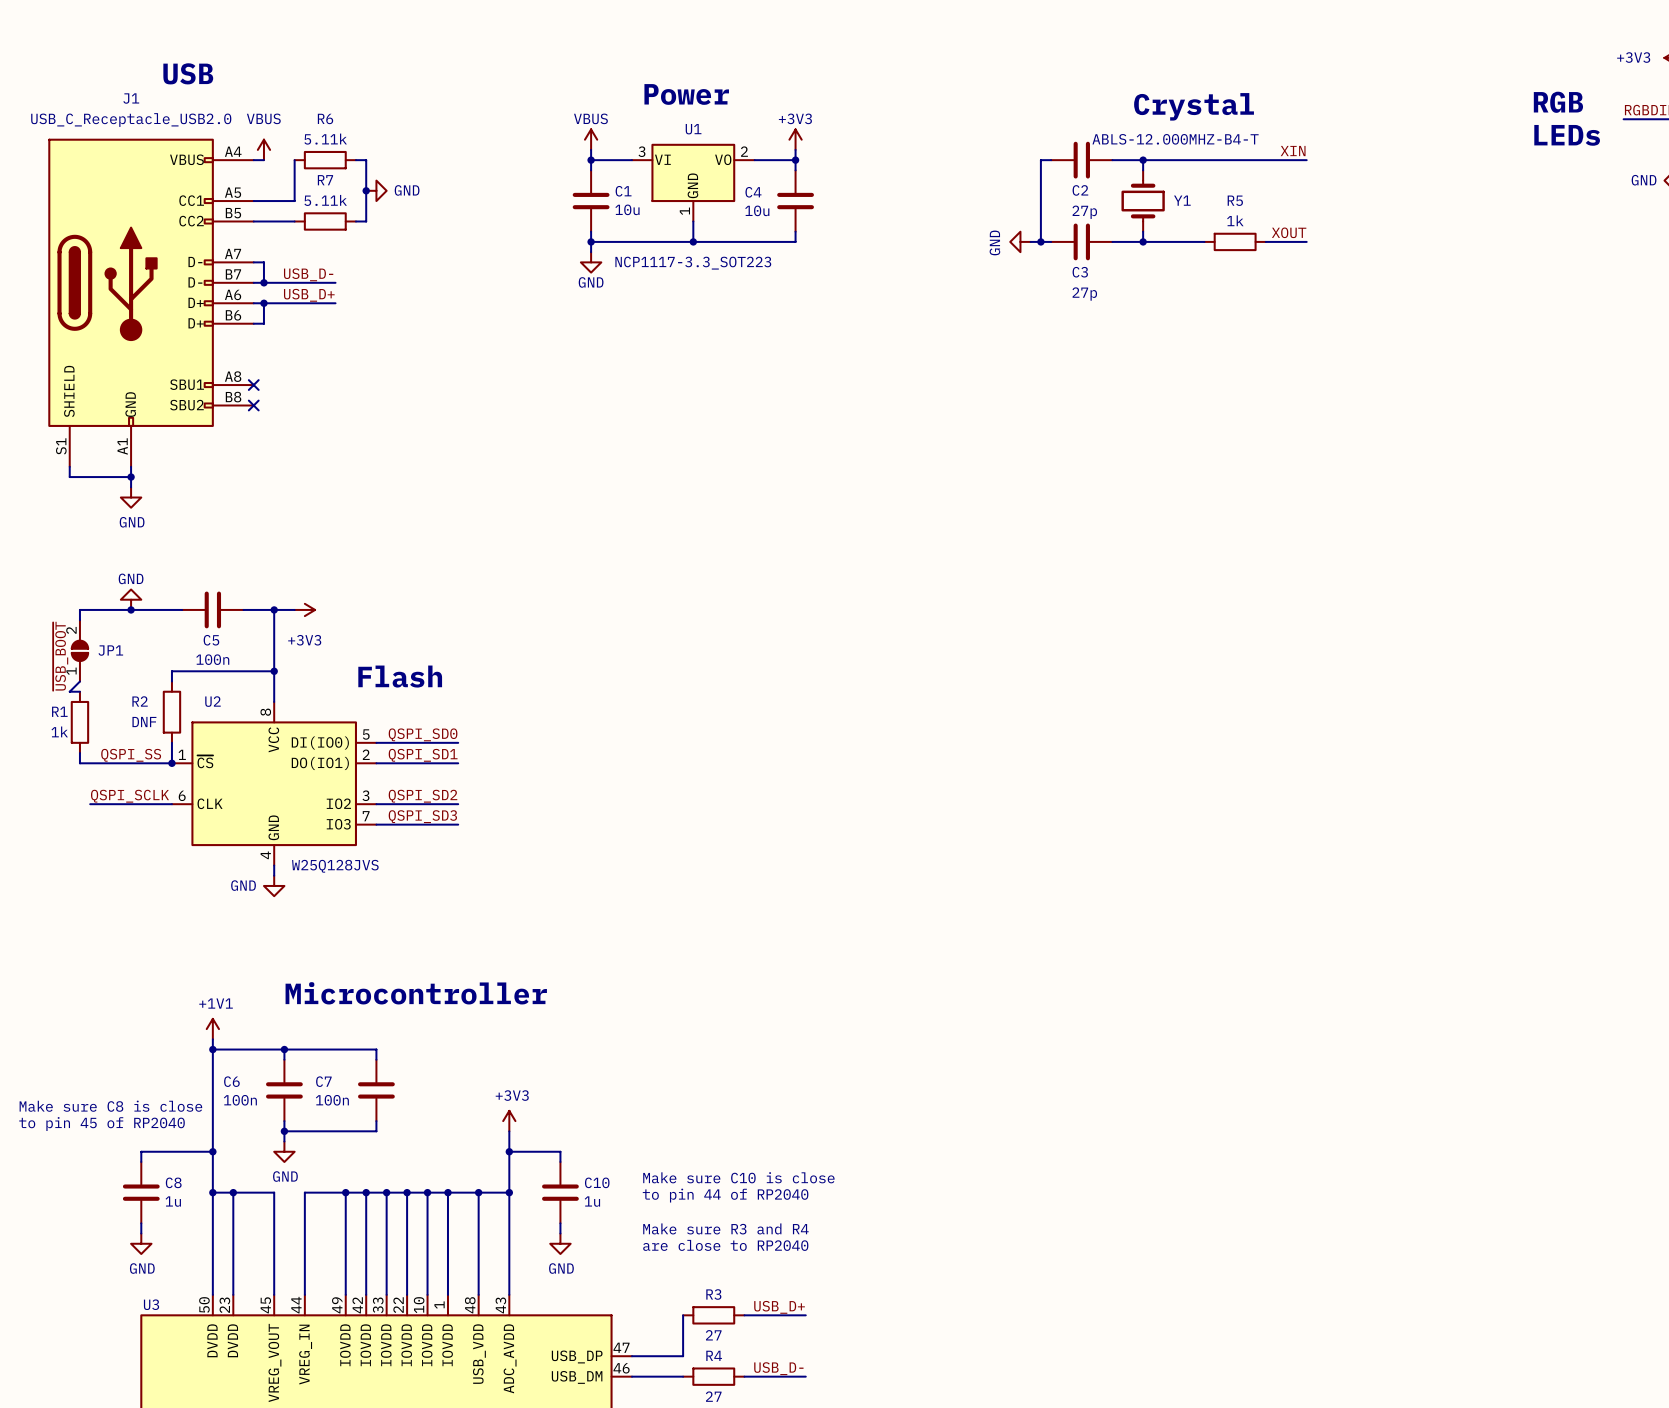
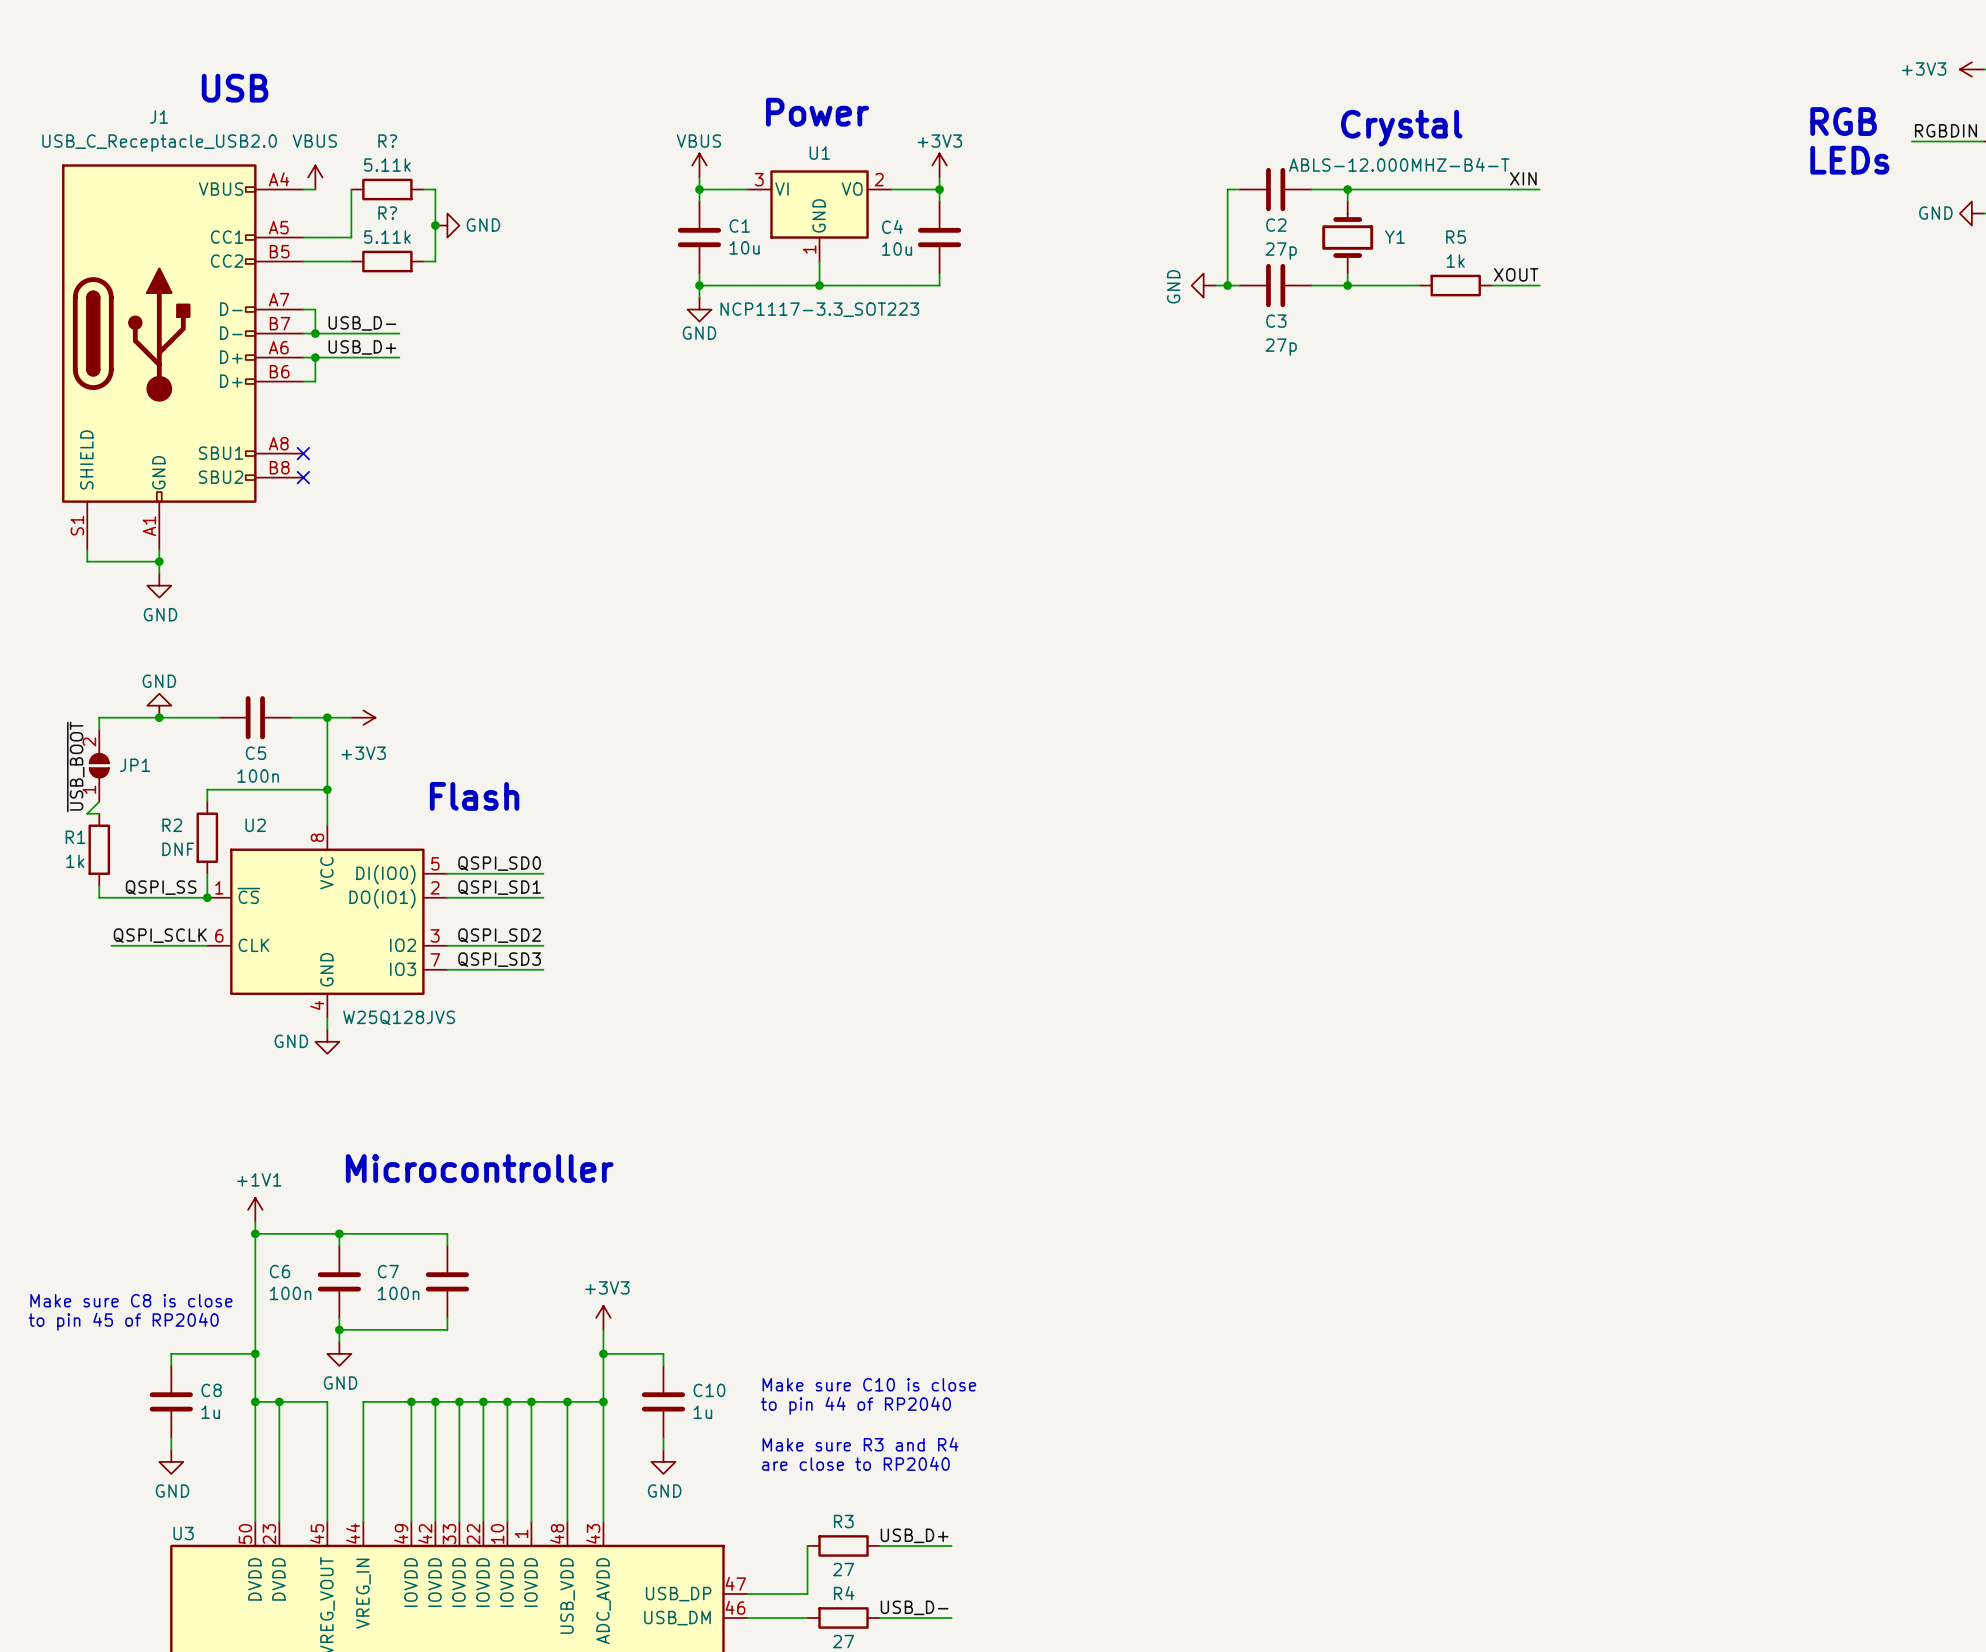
R6 name: R6 (325, 118) -> R? (387, 141)
R7 name: R7 (325, 180) -> R? (387, 213)

